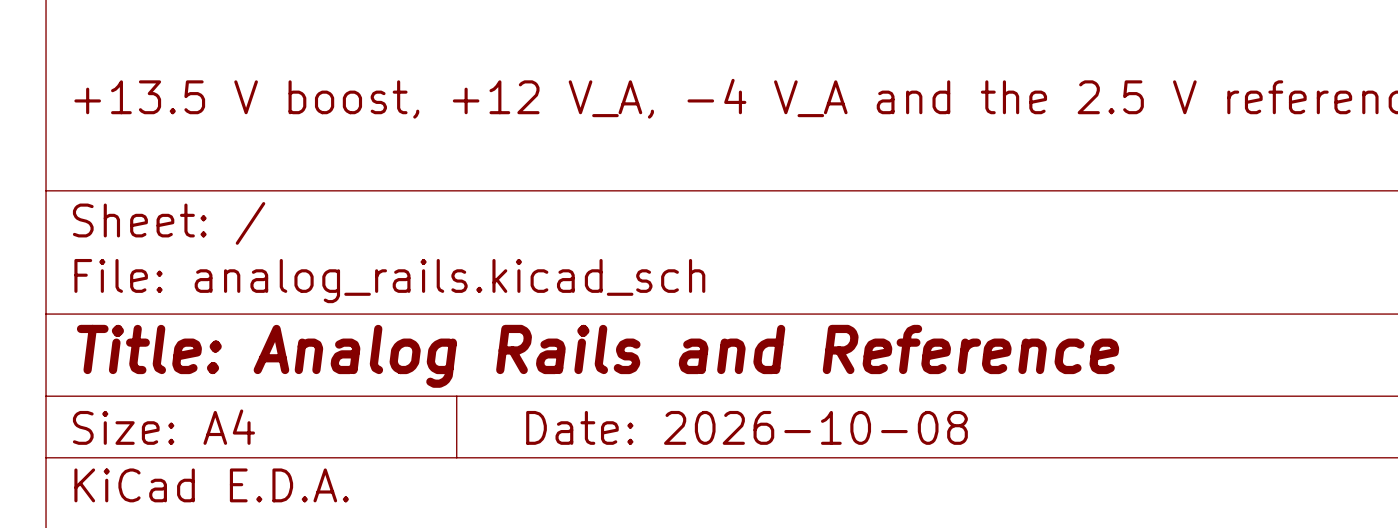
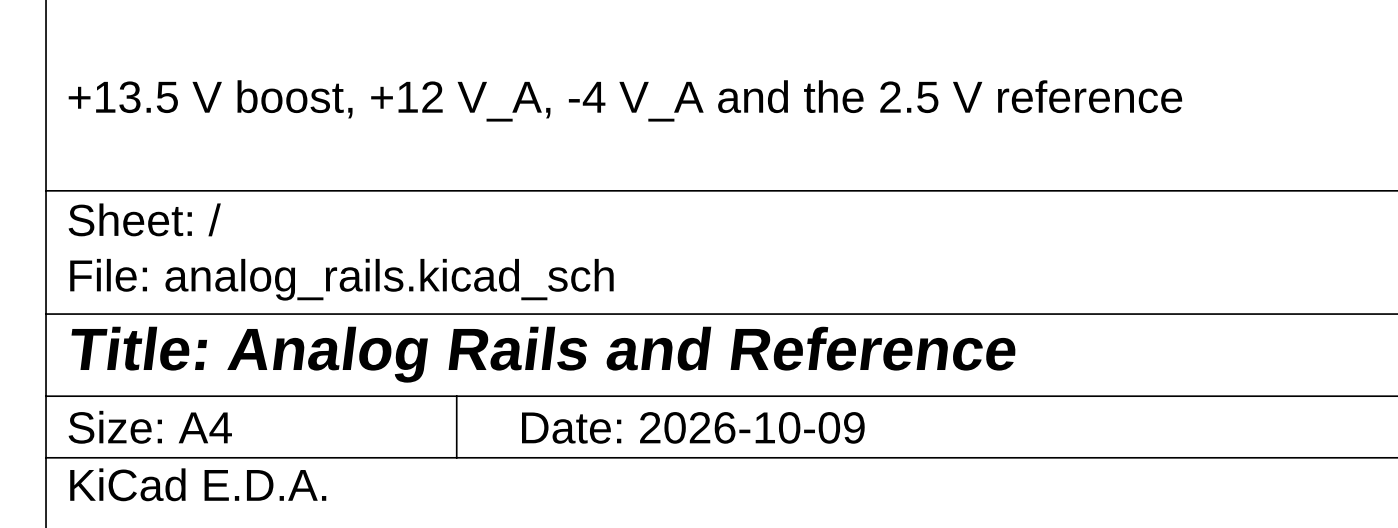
title block: Date: 2026-10-08 (747, 427) -> Date: 2026-10-09 (693, 427)

